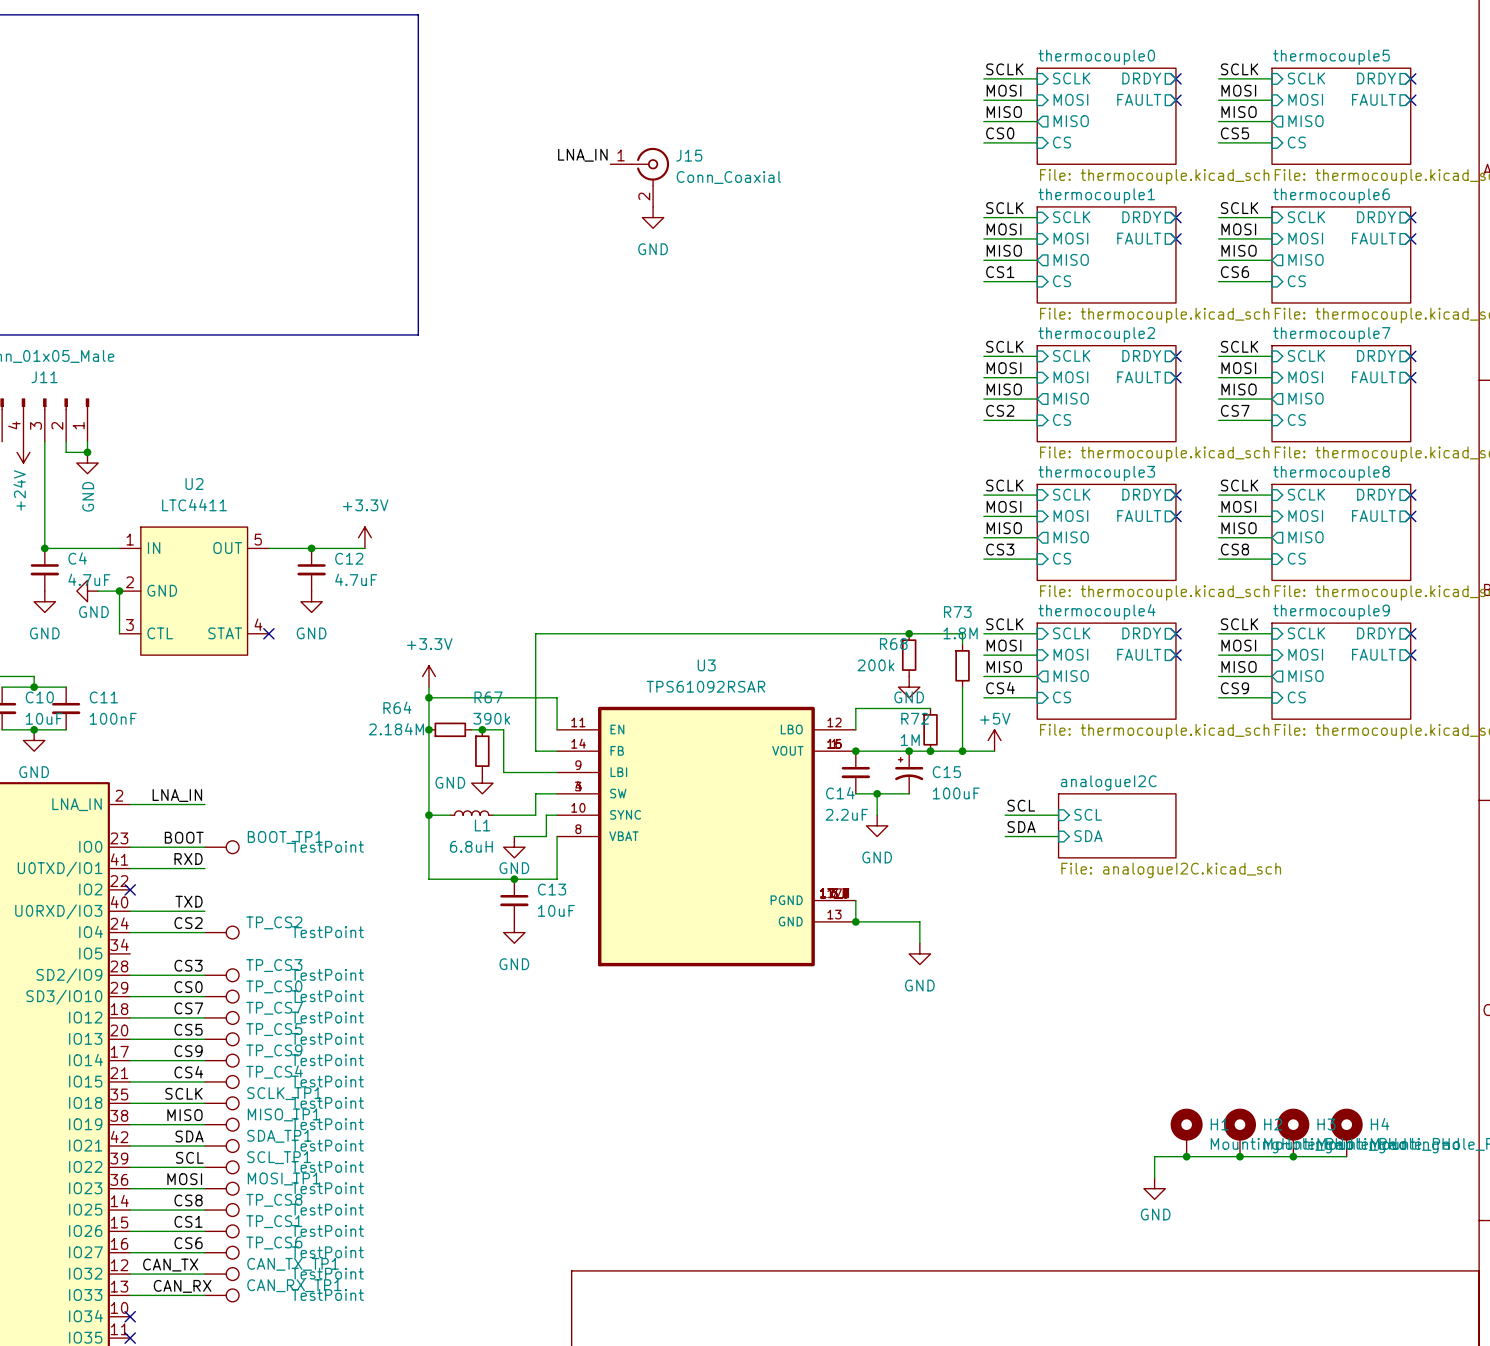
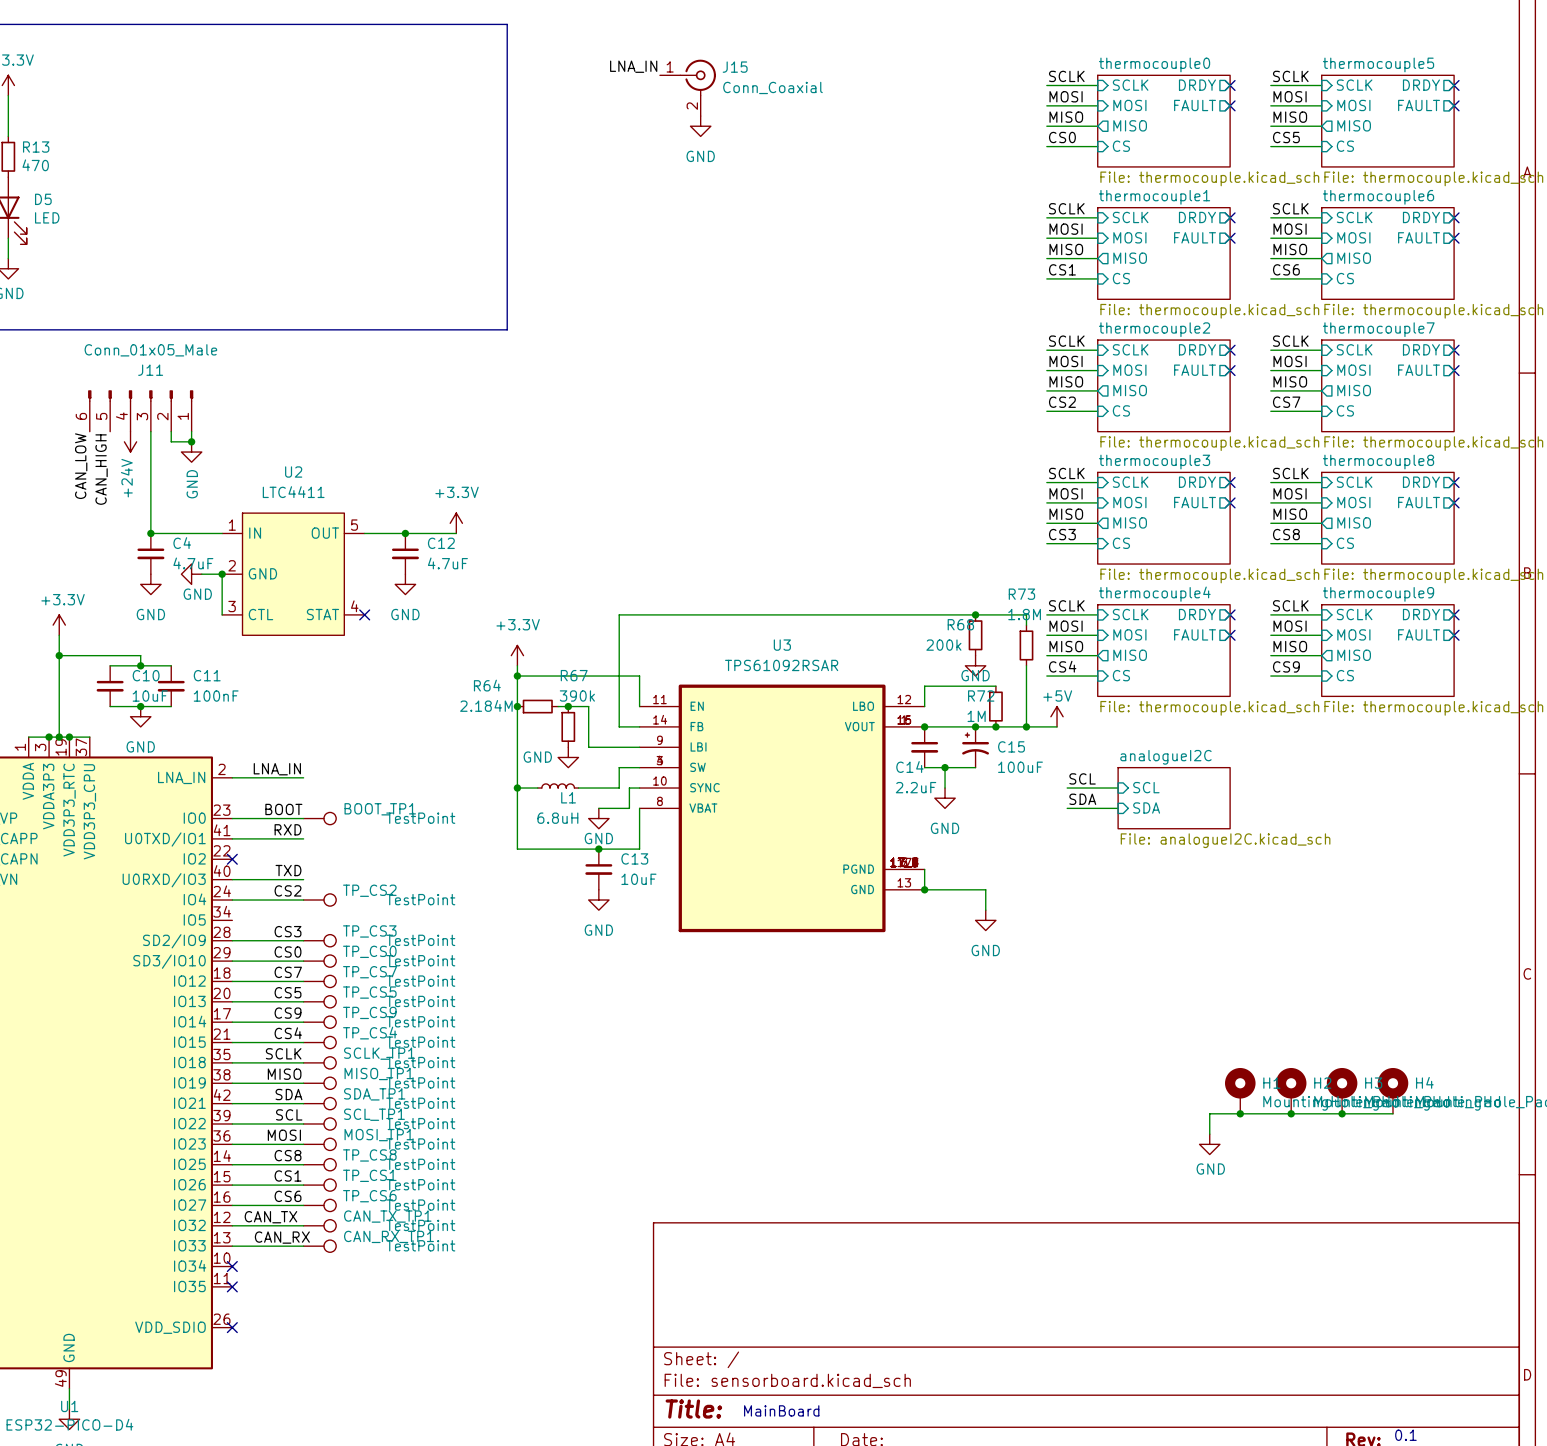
label position: LNA_IN (582, 155) -> LNA_IN (633, 66)
J15 position: (639, 177) -> (687, 87)
power symbol position: GND (653, 217) -> GND (700, 126)

